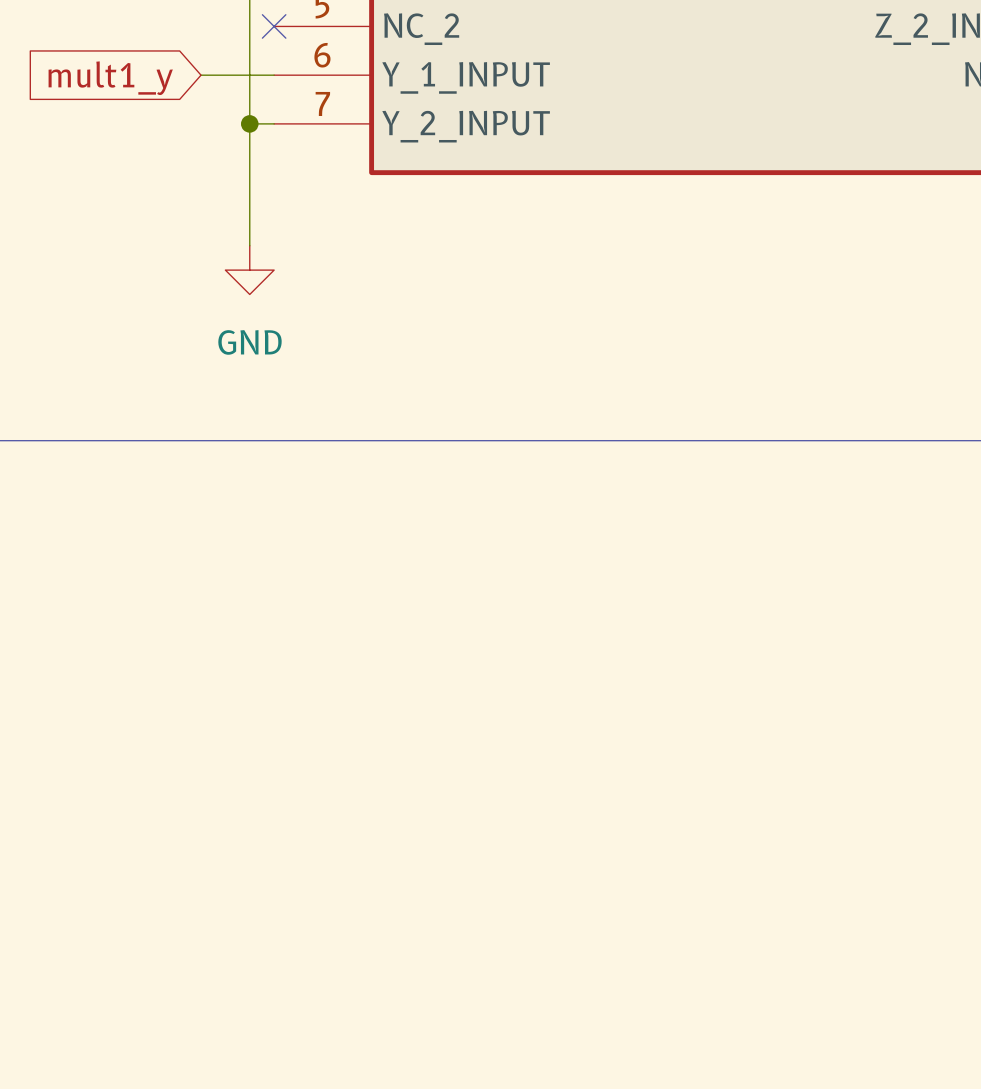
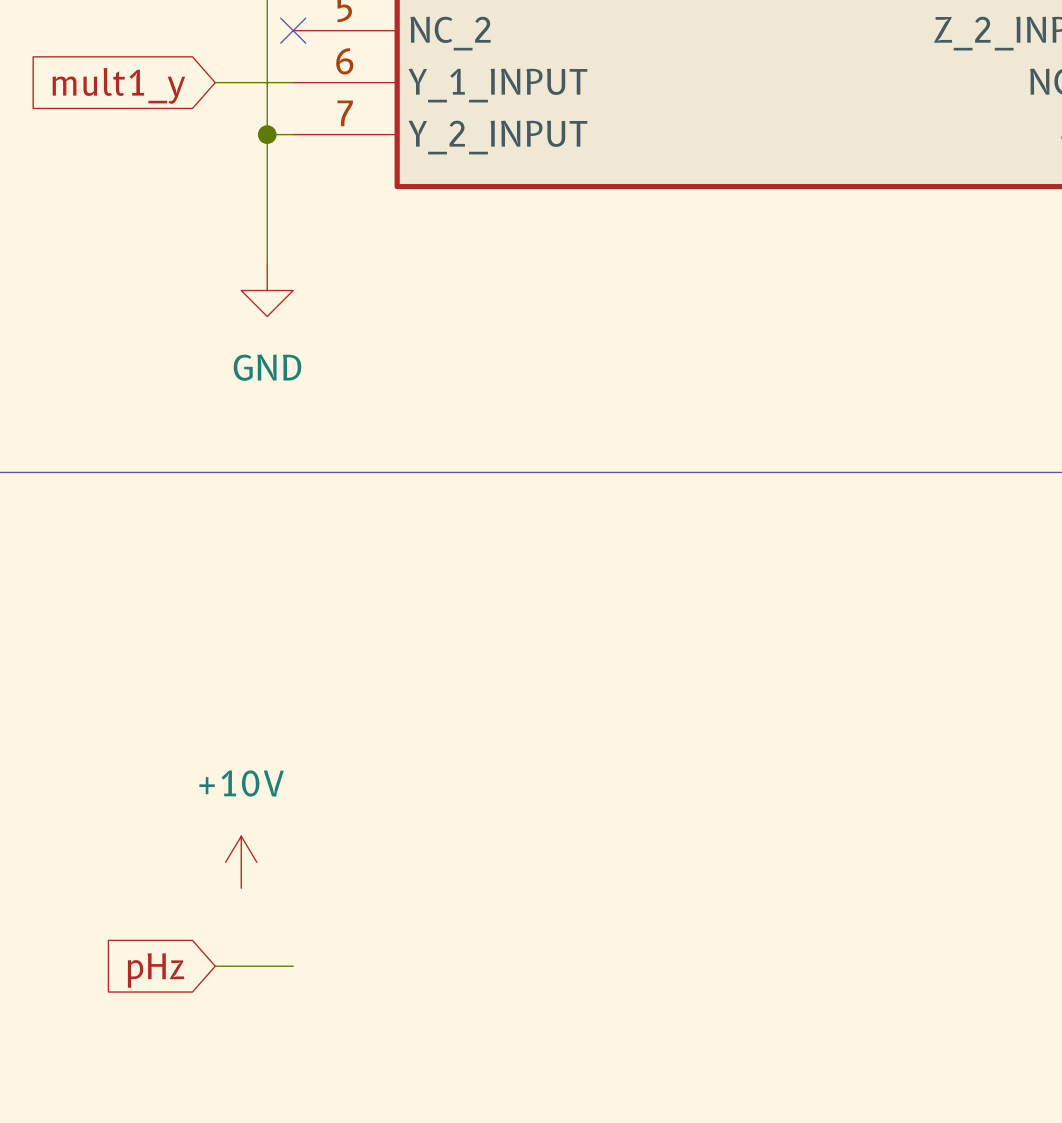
power symbol: none -> +10V (241, 862)
wire: none -> (215, 966) (293, 966)
global label: none -> pHz (156, 970)

